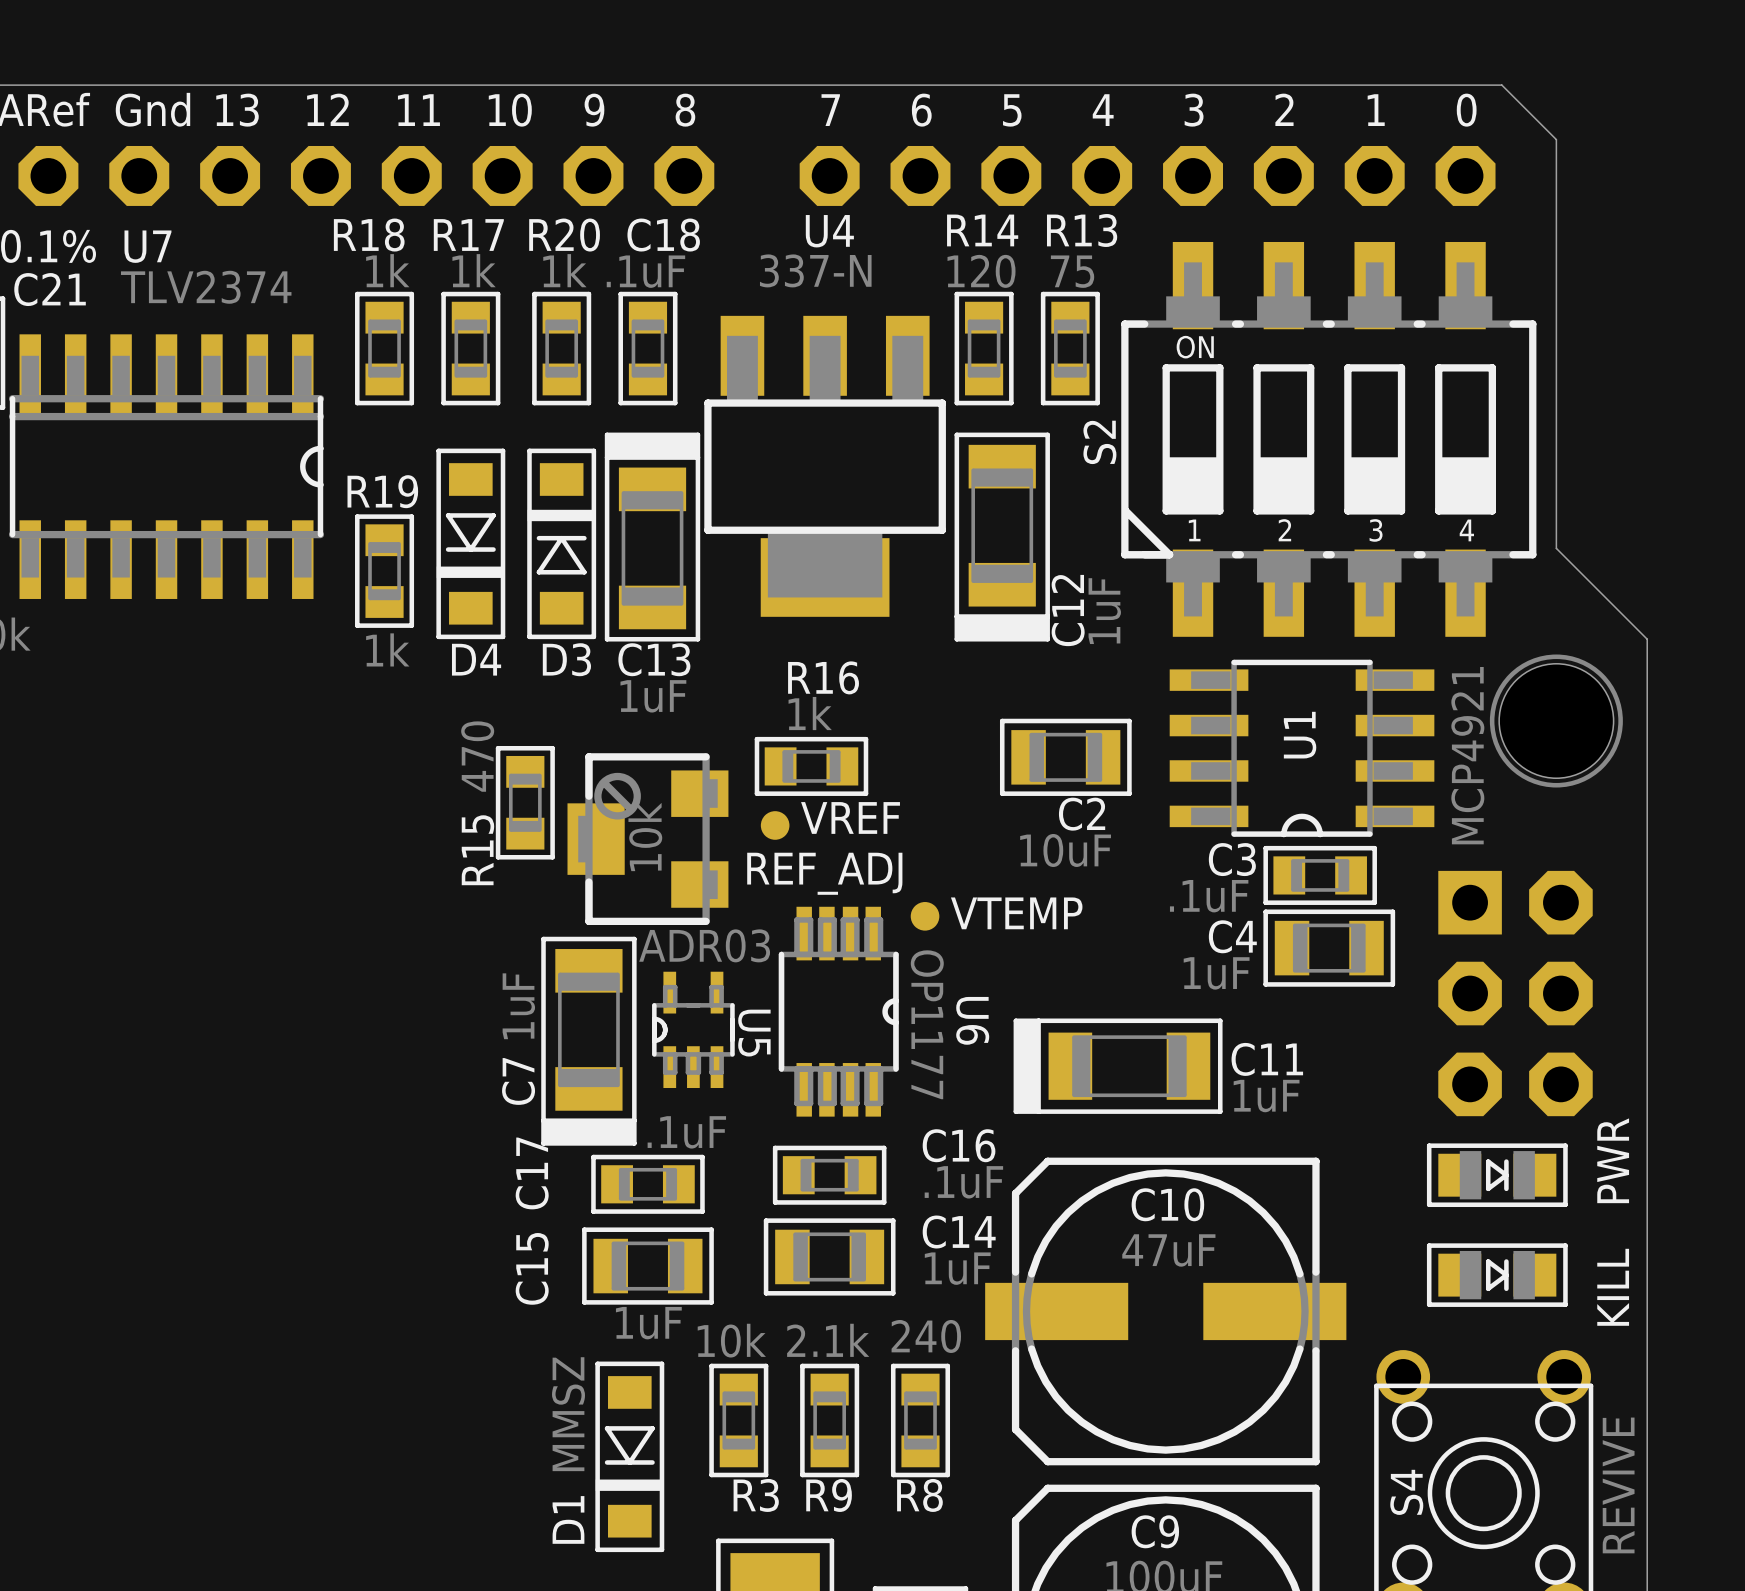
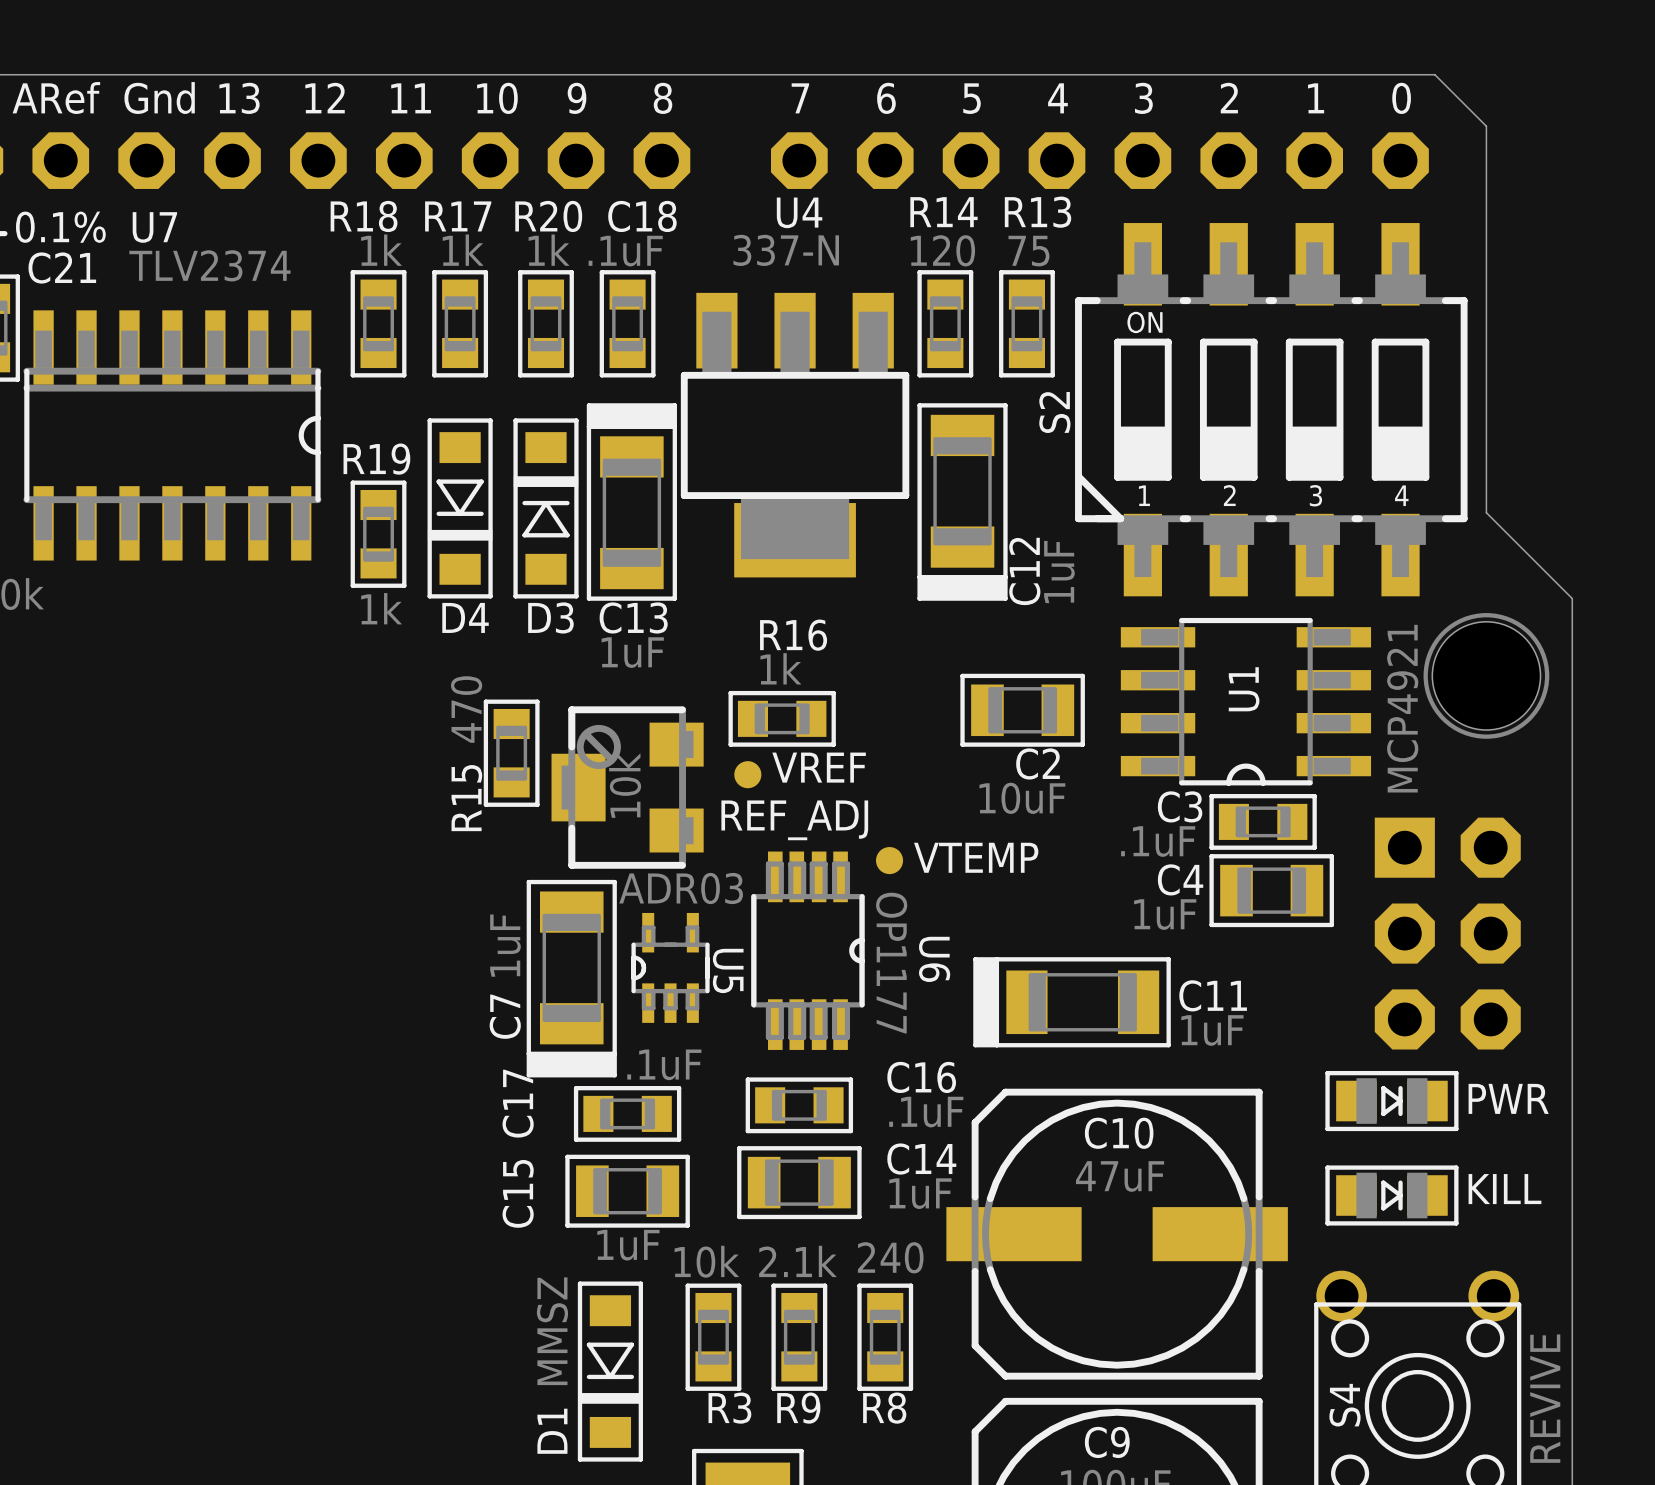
PWR name rotation: 0° (1613, 1160) -> 90° clockwise (1508, 1098)
PWR position: (1497, 1175) -> (1391, 1101)
KILL position: (1497, 1275) -> (1391, 1195)
KILL name rotation: 0° (1613, 1287) -> 90° clockwise (1504, 1189)

